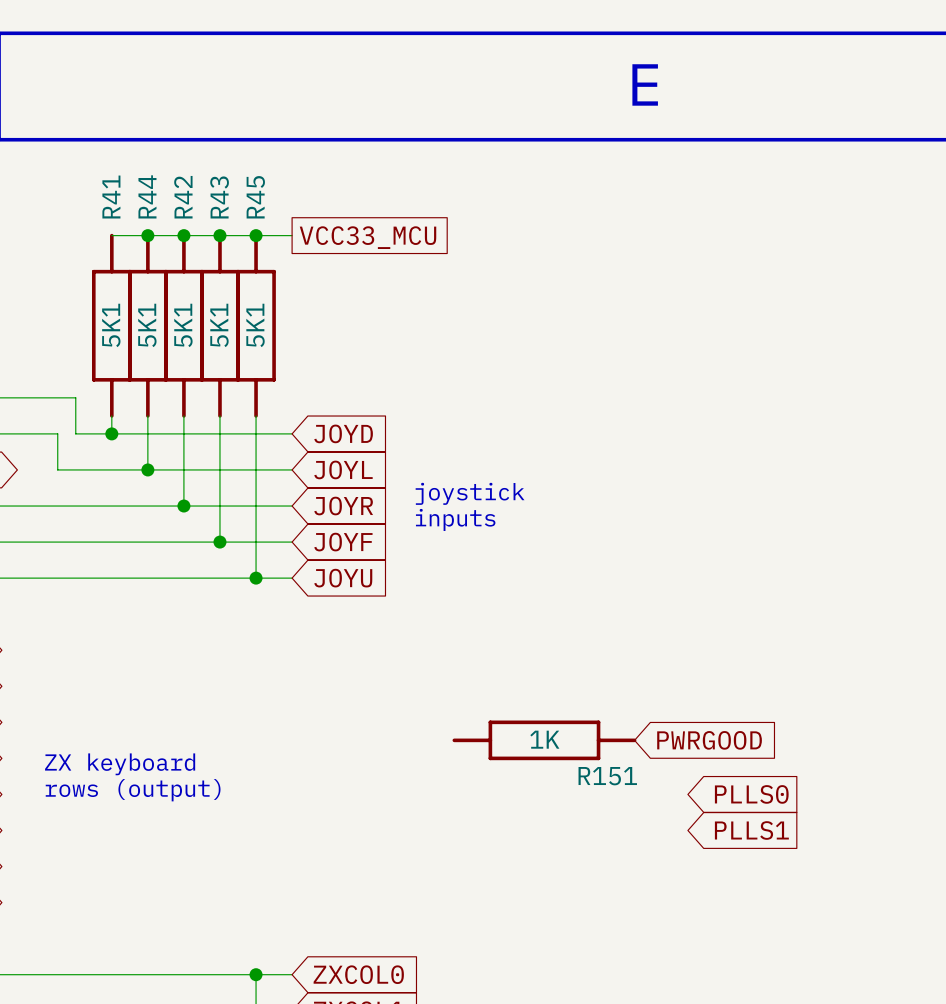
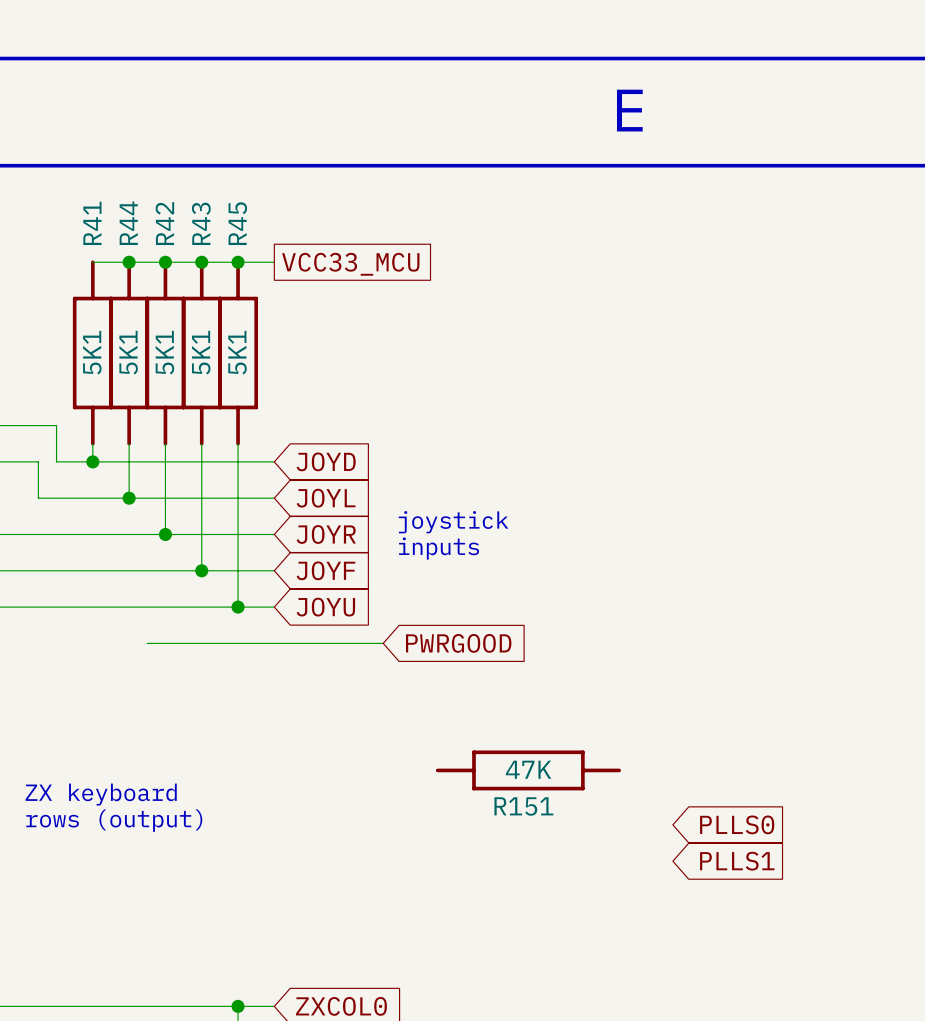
wire: none -> (147, 643) (383, 643)
R151 value: 1K (544, 739) -> 47K (528, 769)
global label position: PWRGOOD (709, 740) -> PWRGOOD (458, 643)
R151 name position: R151 (607, 776) -> R151 (523, 806)

